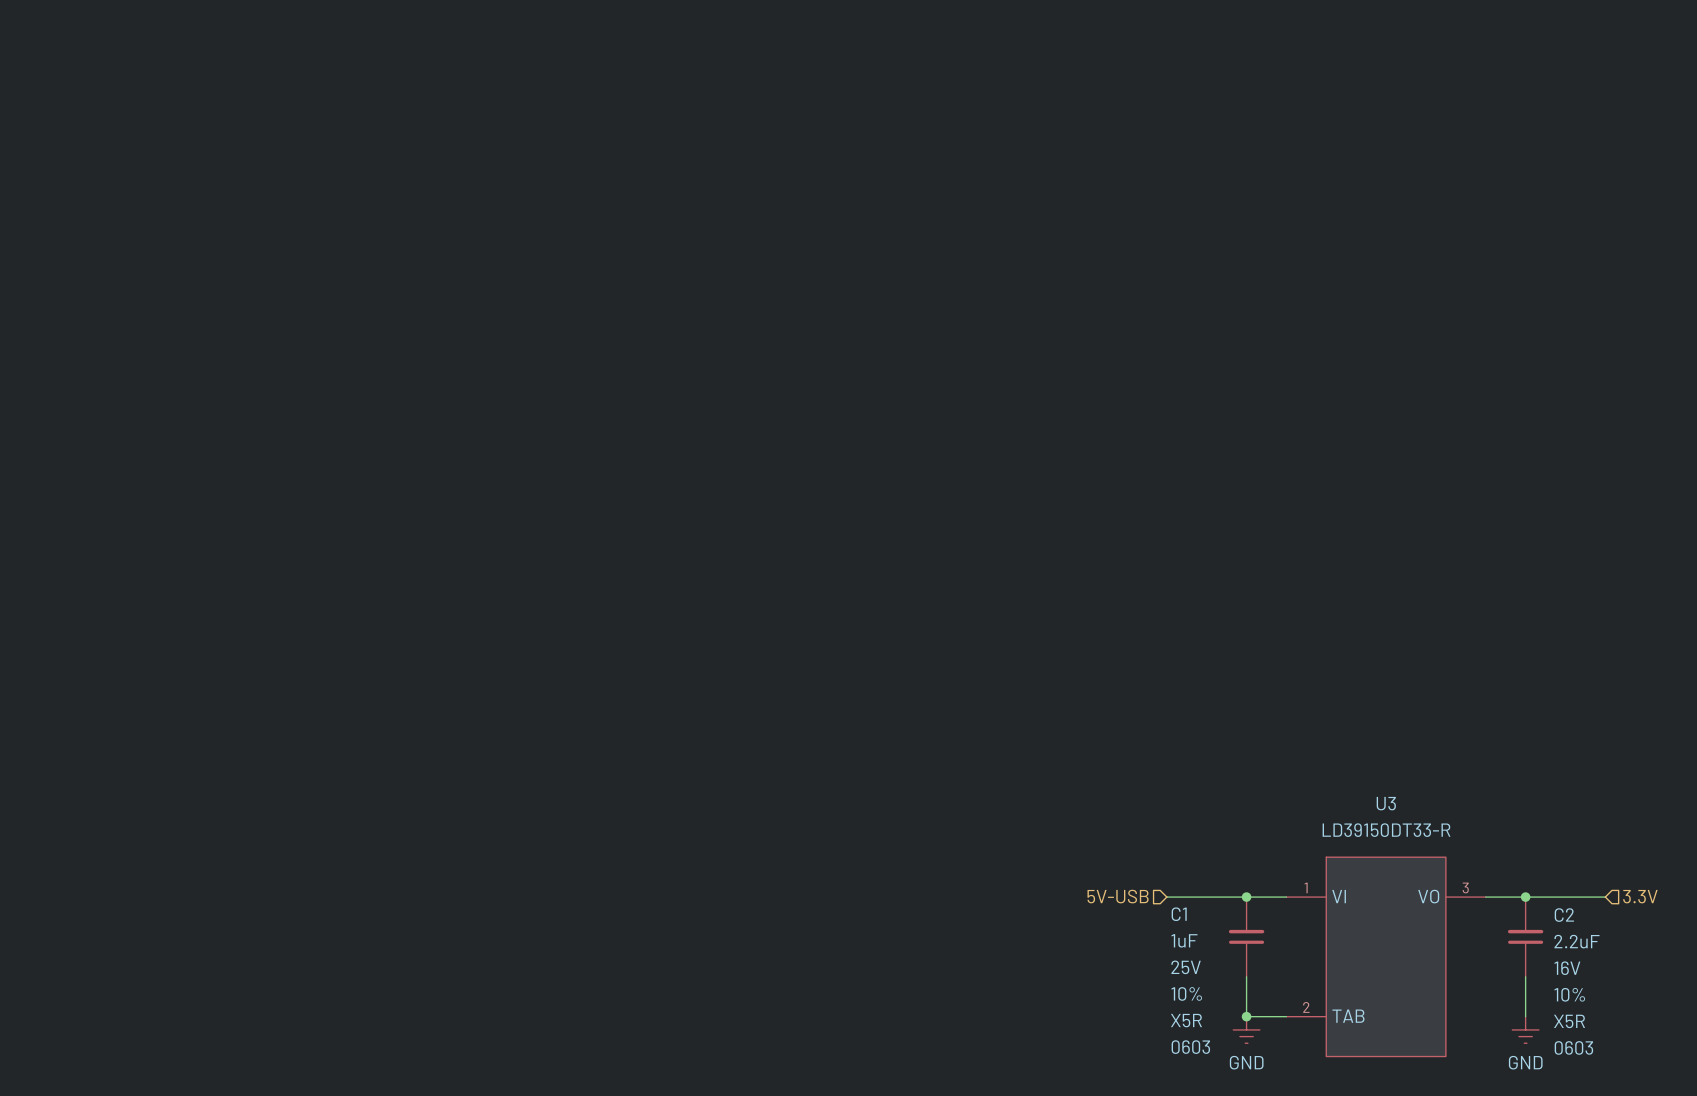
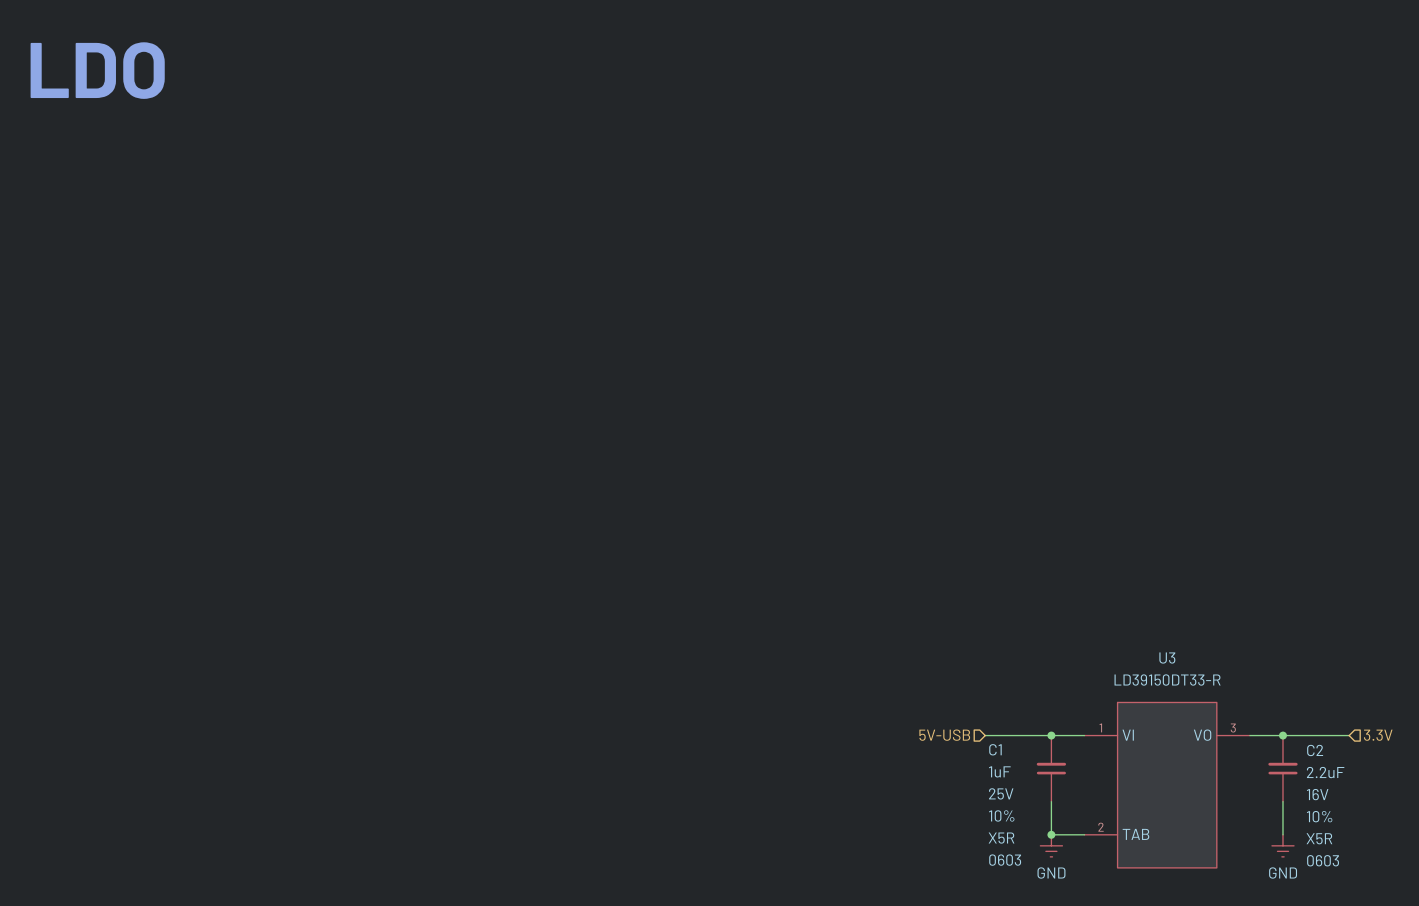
text: none -> LDO (97, 70)

